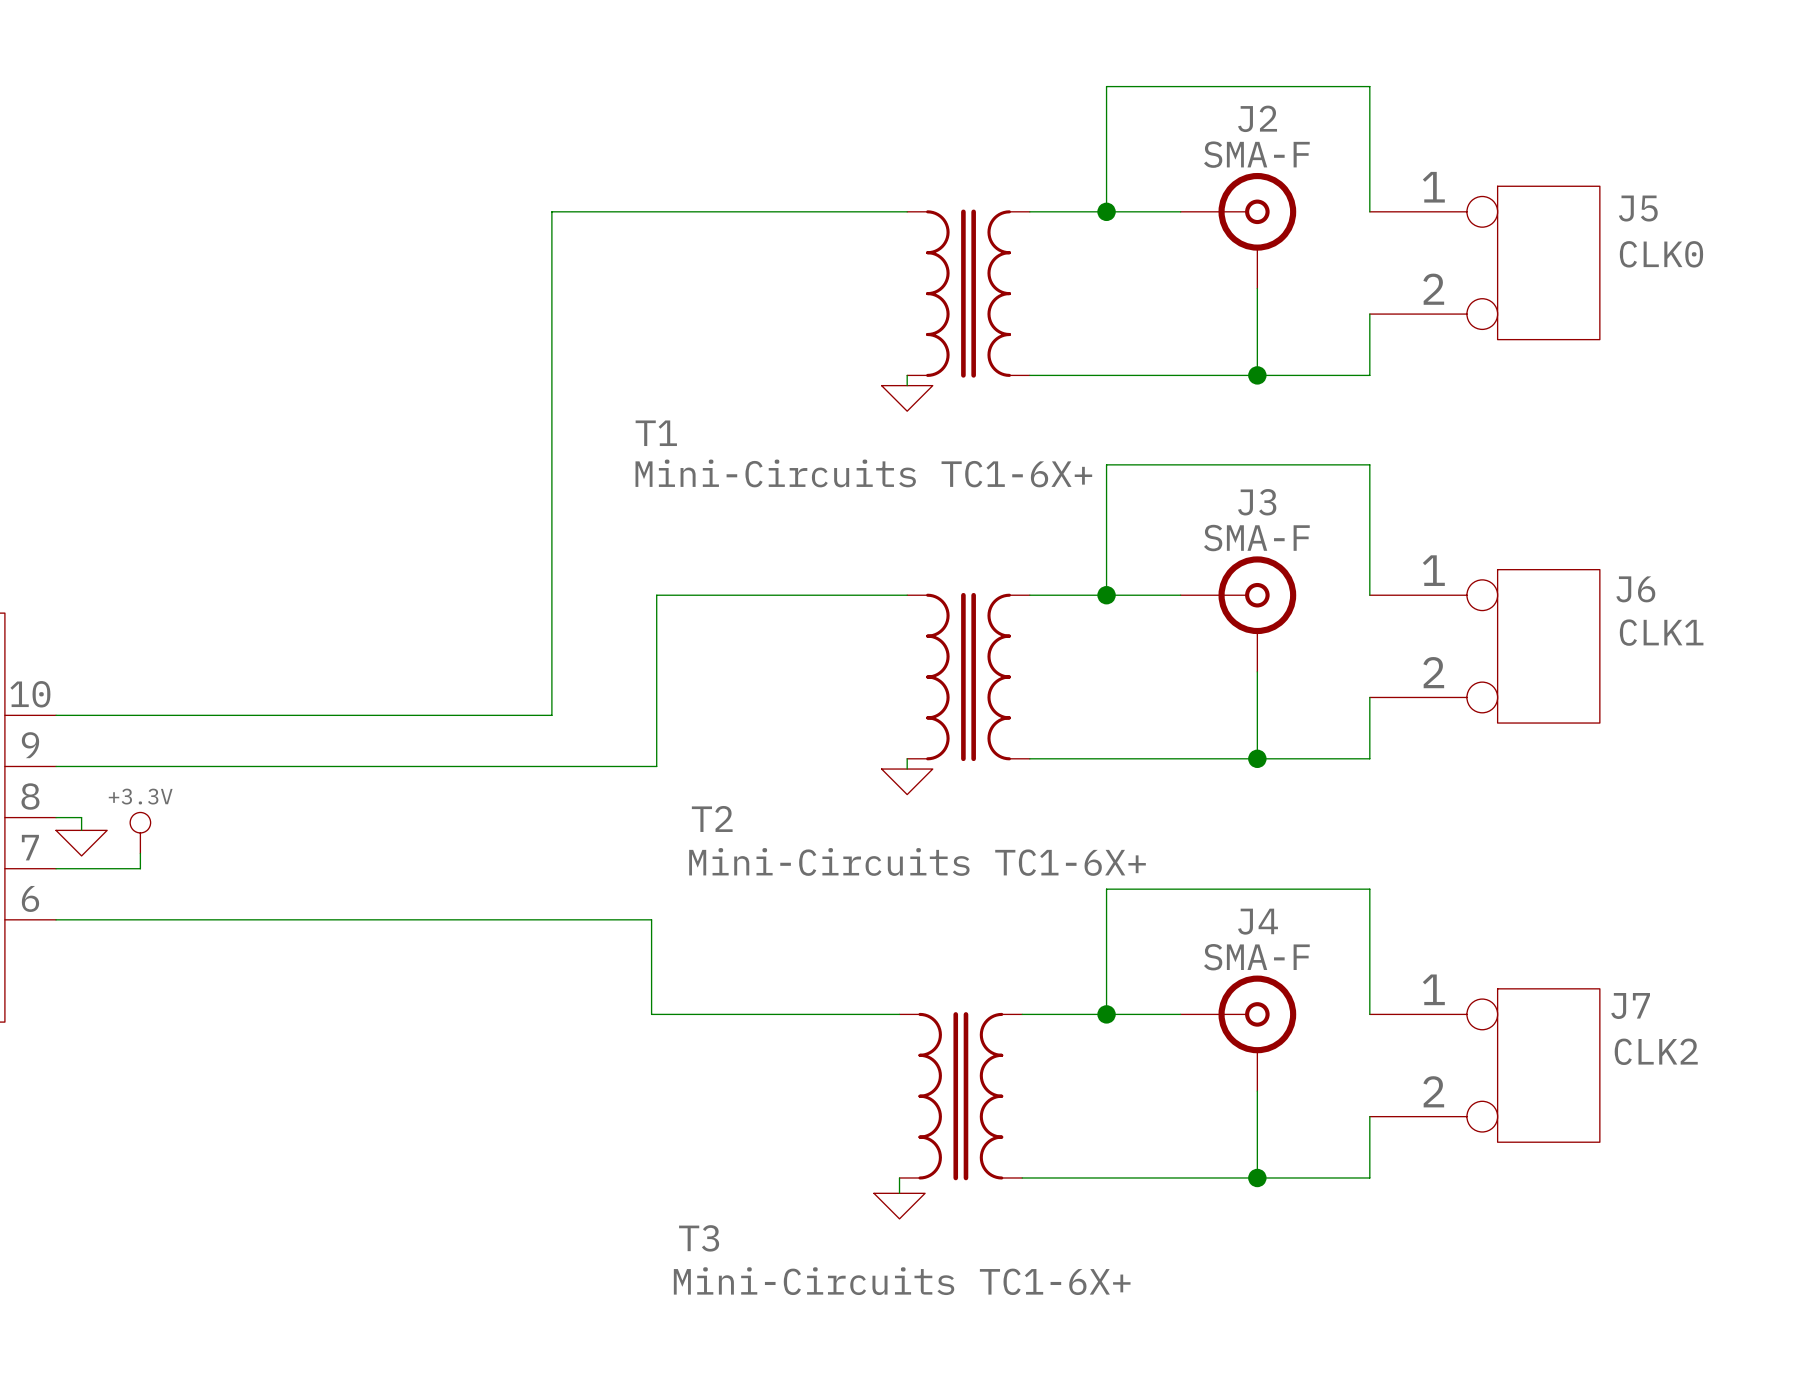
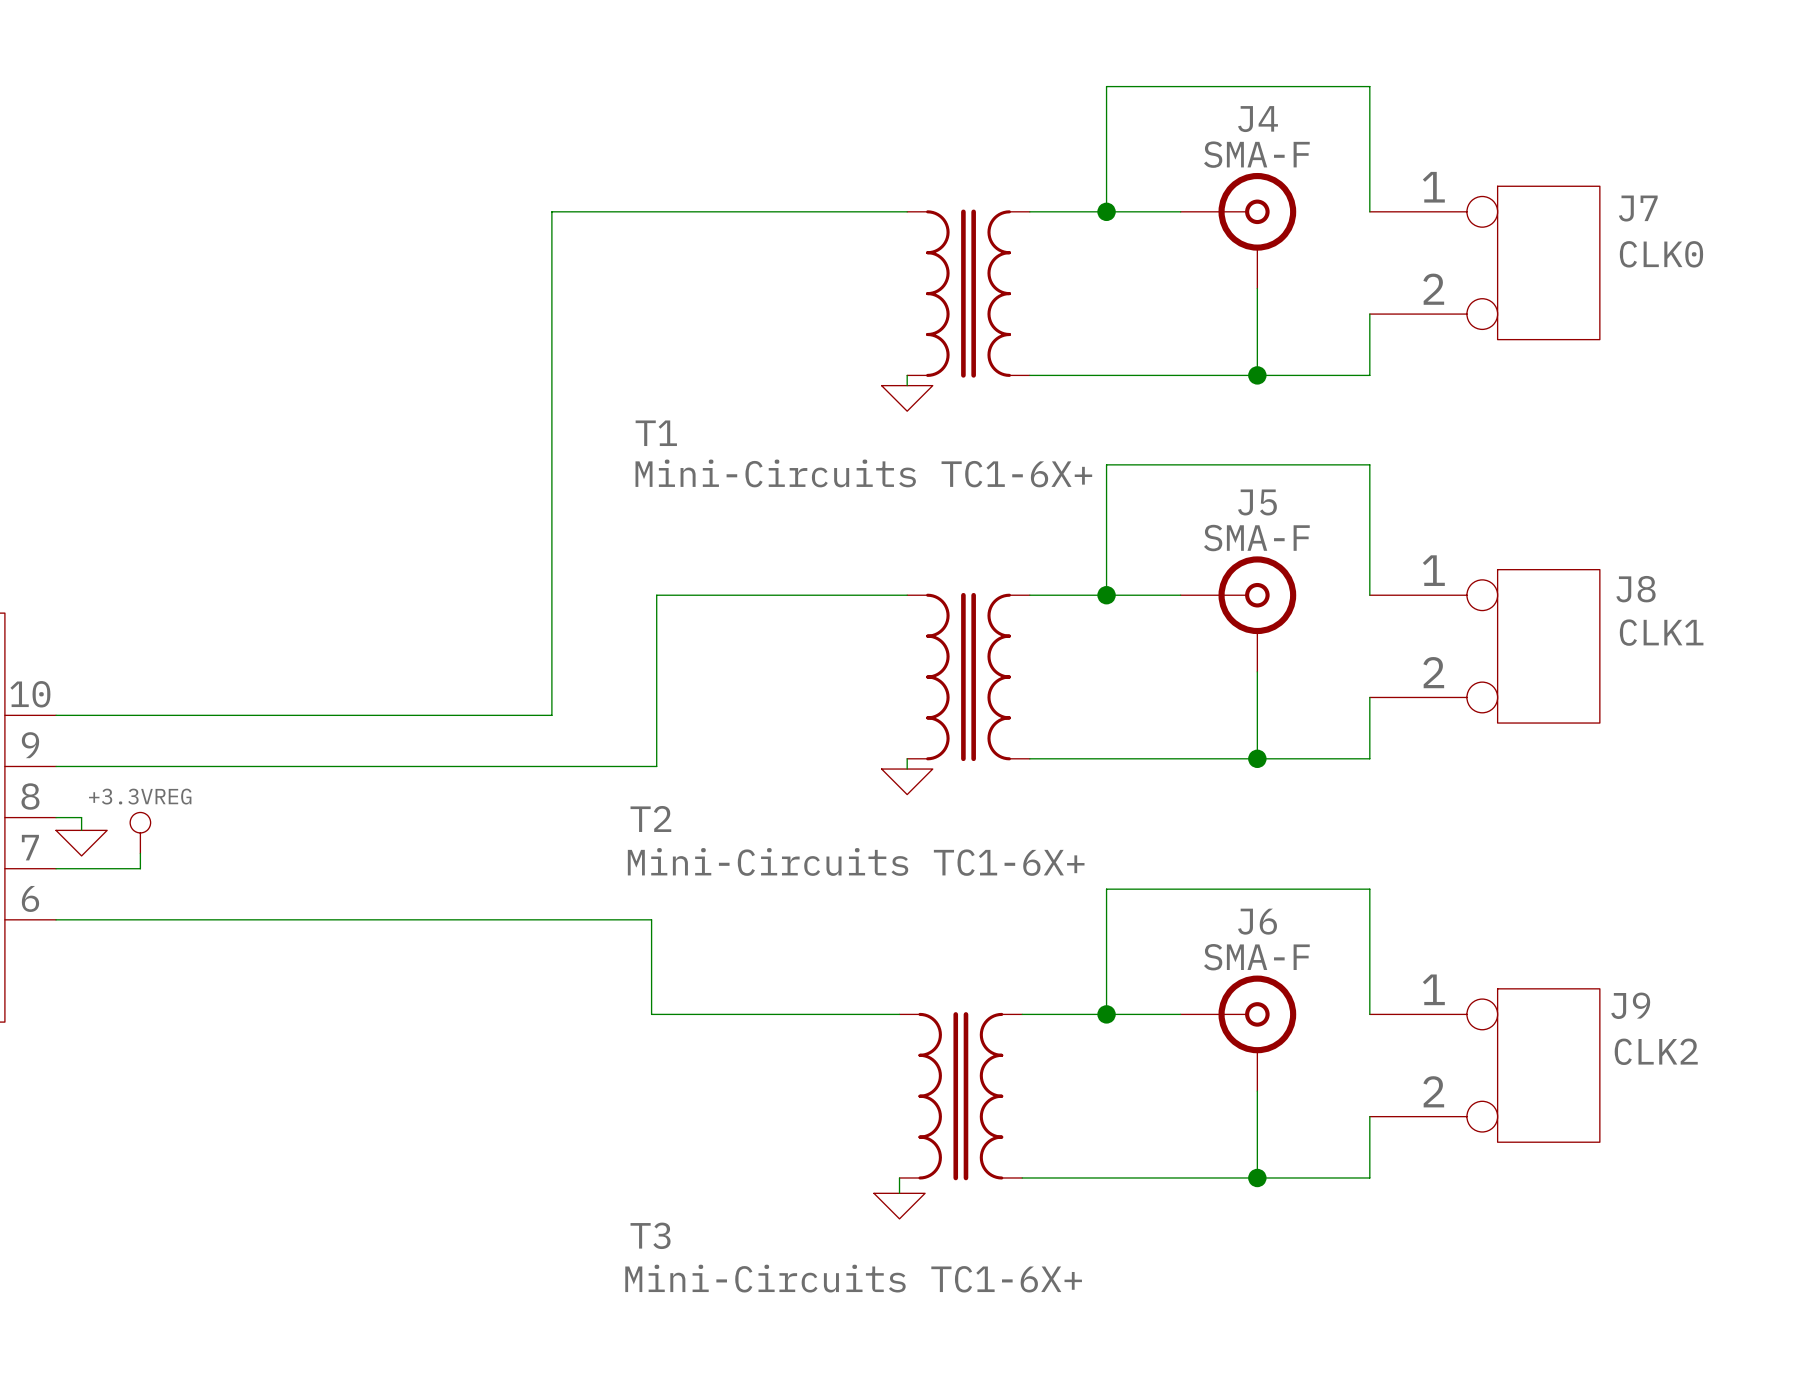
J2 name: J2 (1257, 118) -> J4 (1258, 119)
J5 name: J5 (1638, 208) -> J7 (1638, 208)
J3 name: J3 (1257, 502) -> J5 (1257, 502)
J6 name: J6 (1635, 589) -> J8 (1635, 589)
T2 name position: T2 (712, 818) -> T2 (650, 818)
power symbol: +3.3V (140, 832) -> +3.3VREG (140, 832)
T2 value position: Mini-Circuits TC1-6X+ (917, 861) -> Mini-Circuits TC1-6X+ (856, 861)
J4 name: J4 (1258, 921) -> J6 (1257, 921)
J7 name: J7 (1630, 1006) -> J9 (1630, 1005)
T3 name position: T3 (699, 1238) -> T3 (650, 1235)
T3 value position: Mini-Circuits TC1-6X+ (902, 1281) -> Mini-Circuits TC1-6X+ (853, 1278)

